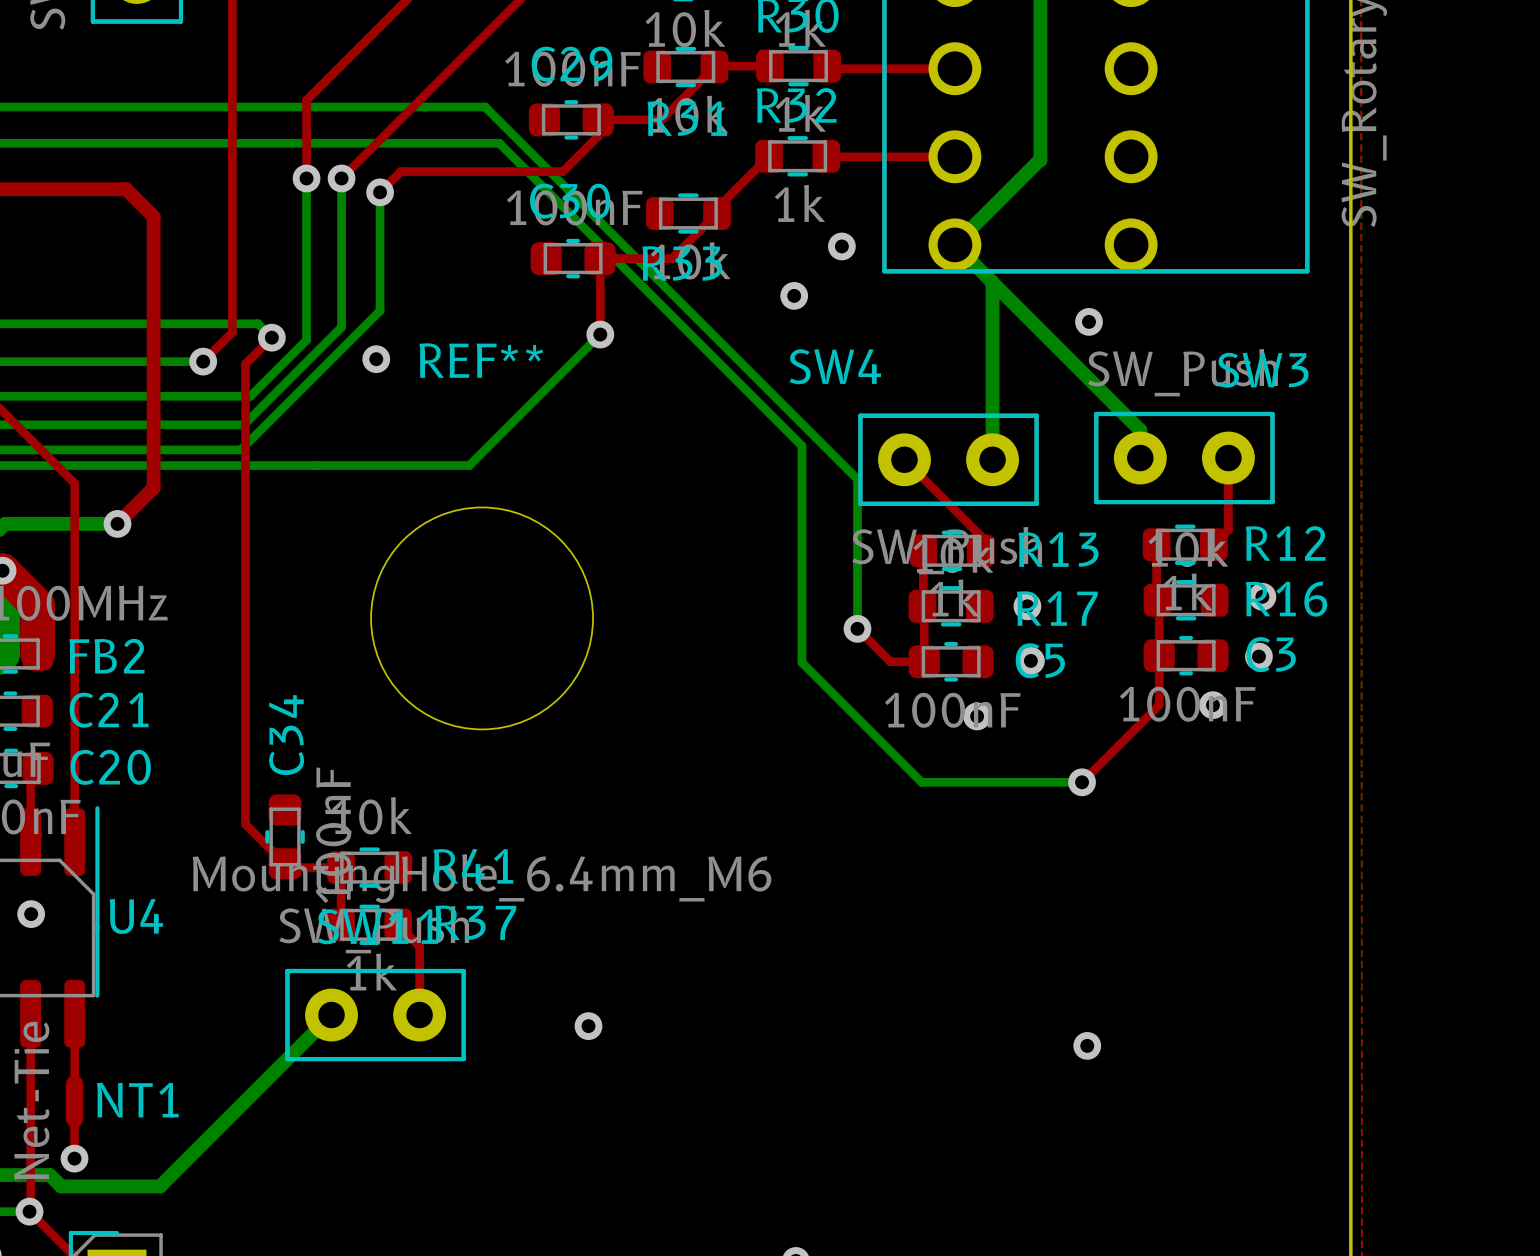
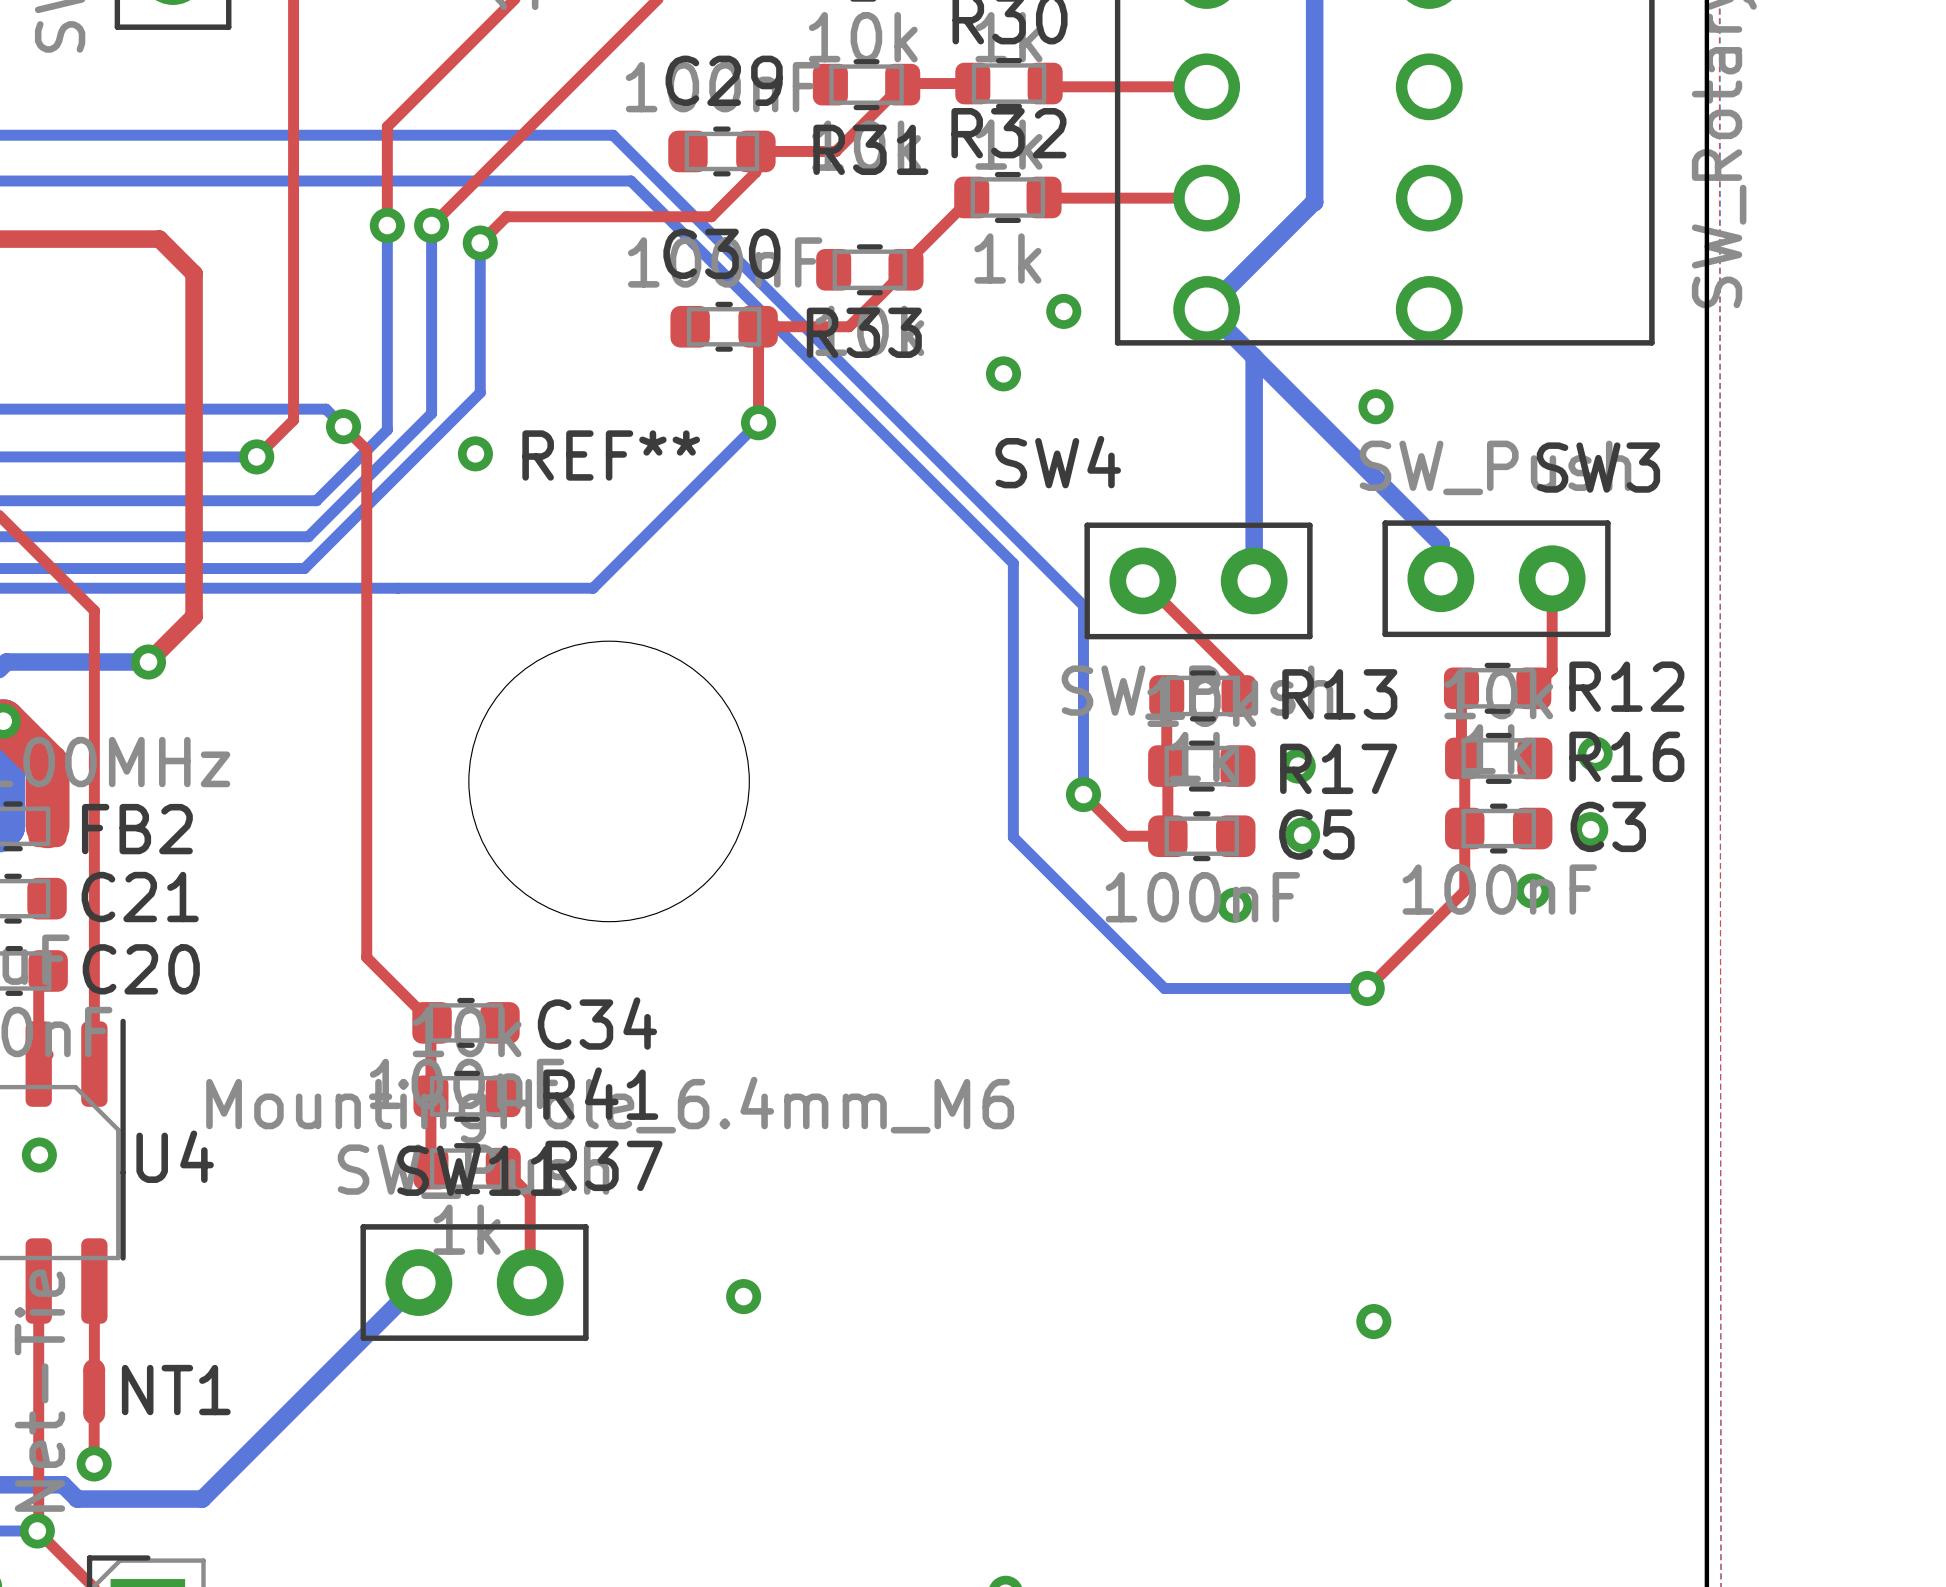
top track: (271, 337) (245, 364) (245, 824) (288, 867) (341, 867) -> (343, 426) (366, 449) (366, 957) (432, 1022) (430, 1096)
C34 rotation: 0° (285, 836) -> 90° clockwise (466, 1022)
C34 position: (285, 836) -> (466, 1022)

